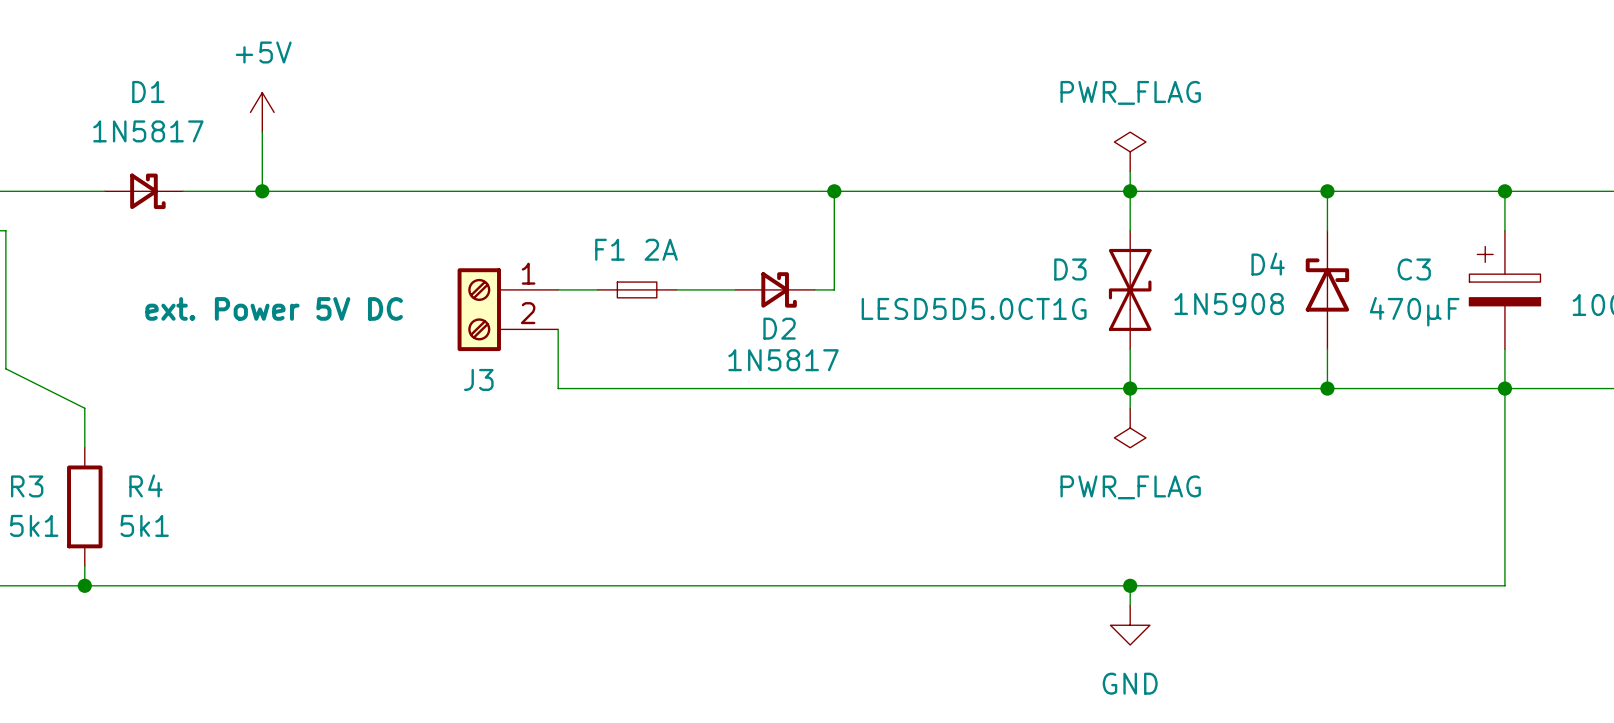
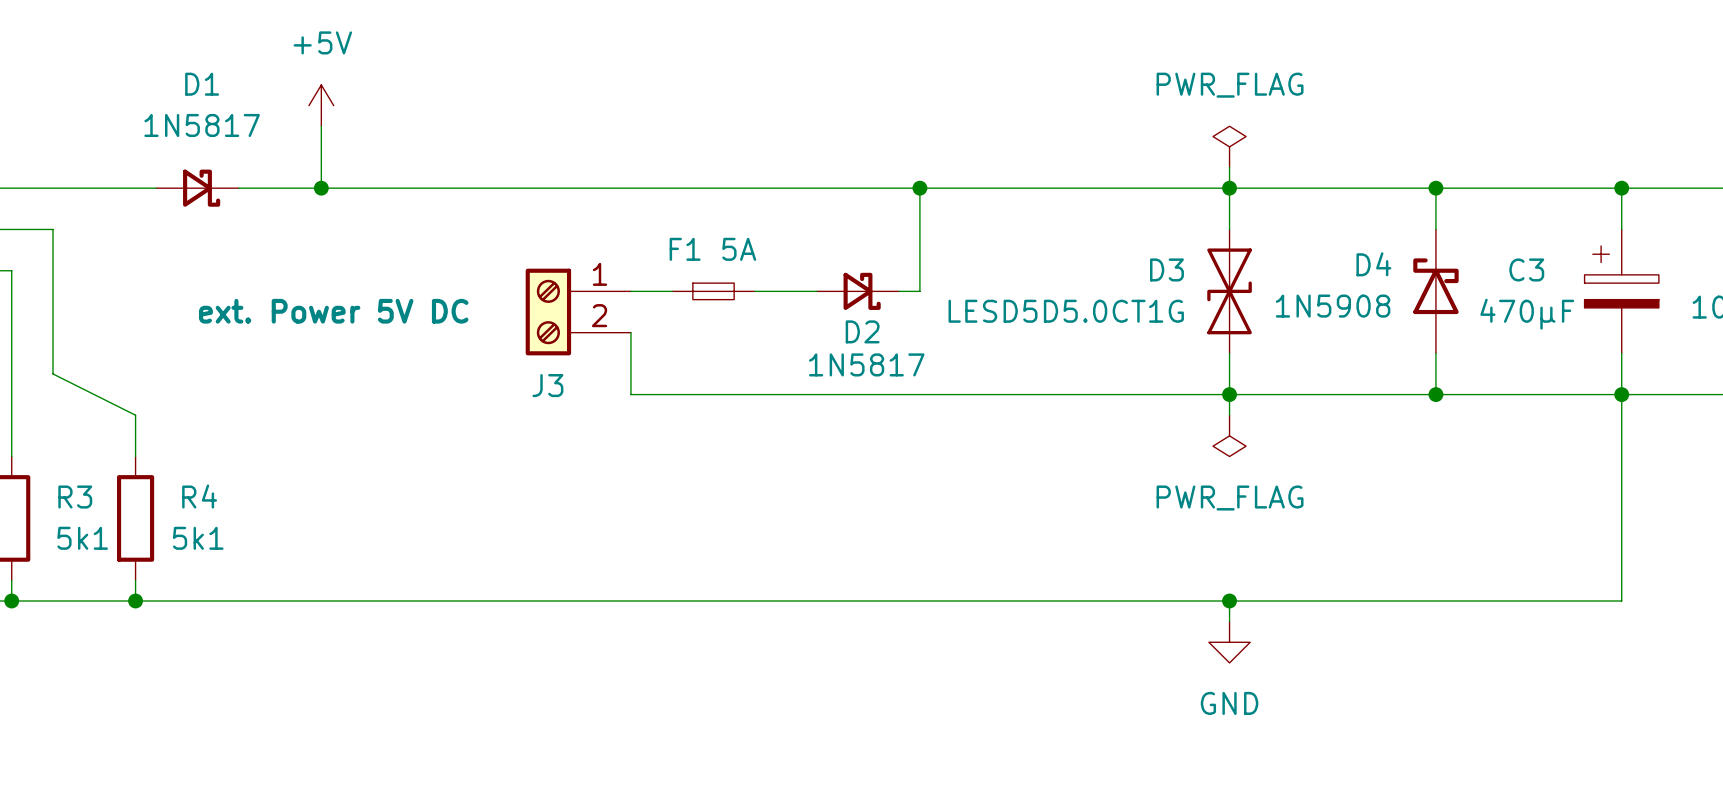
F1 value: 2A (661, 249) -> 5A (739, 249)

